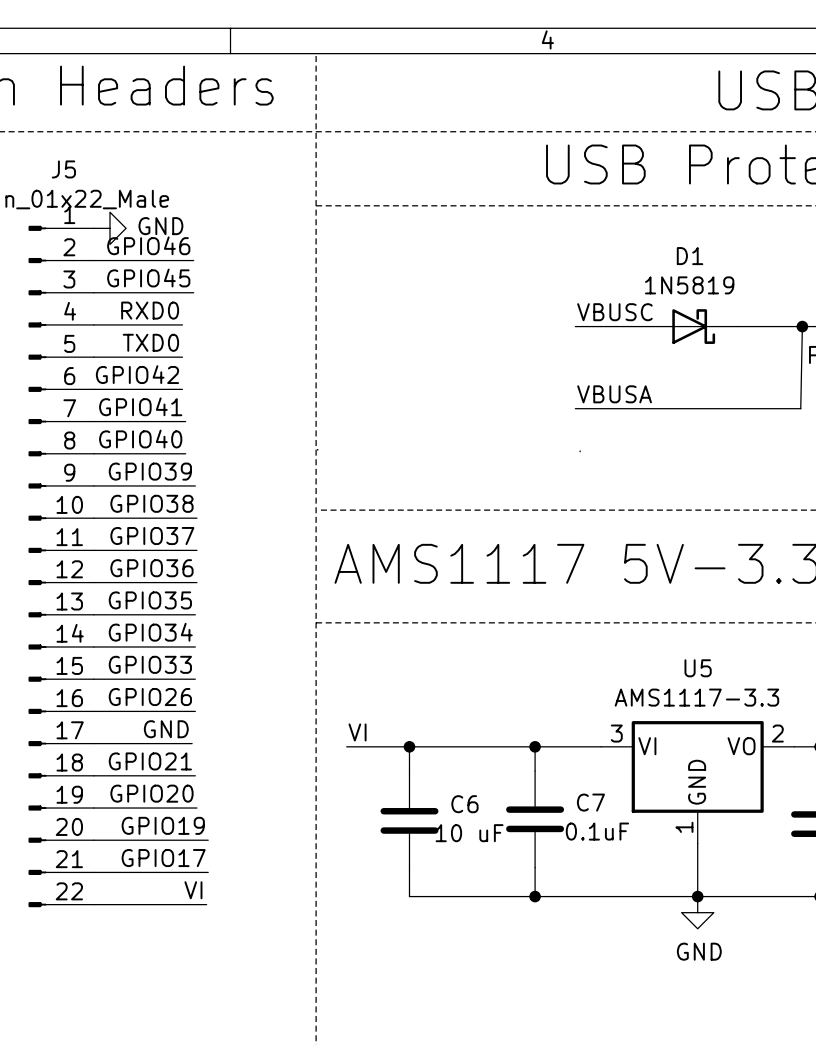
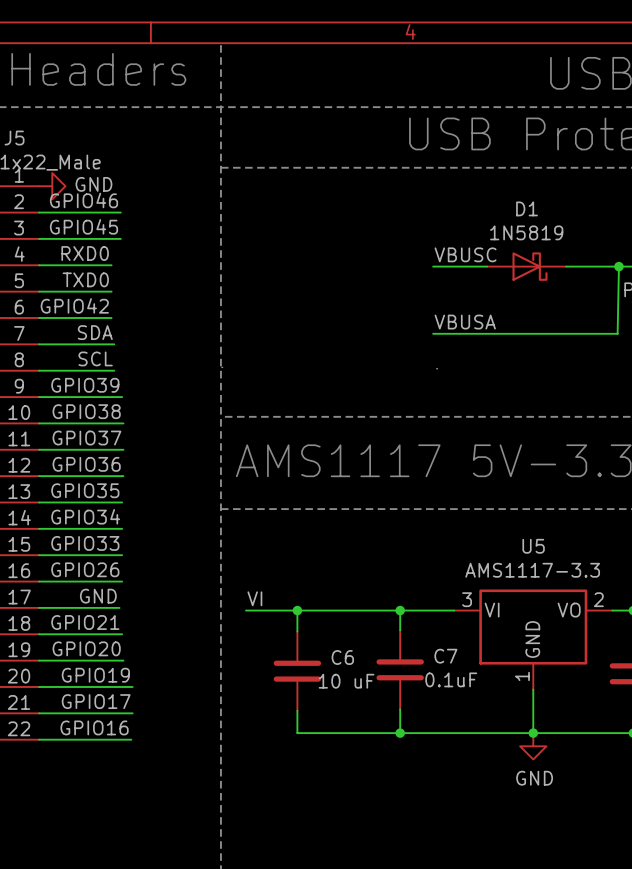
label: GPIO41 (140, 406) -> SDA (95, 332)
label: GPIO40 (140, 439) -> SCL (95, 358)
label: VI (193, 890) -> GPIO16 (94, 727)

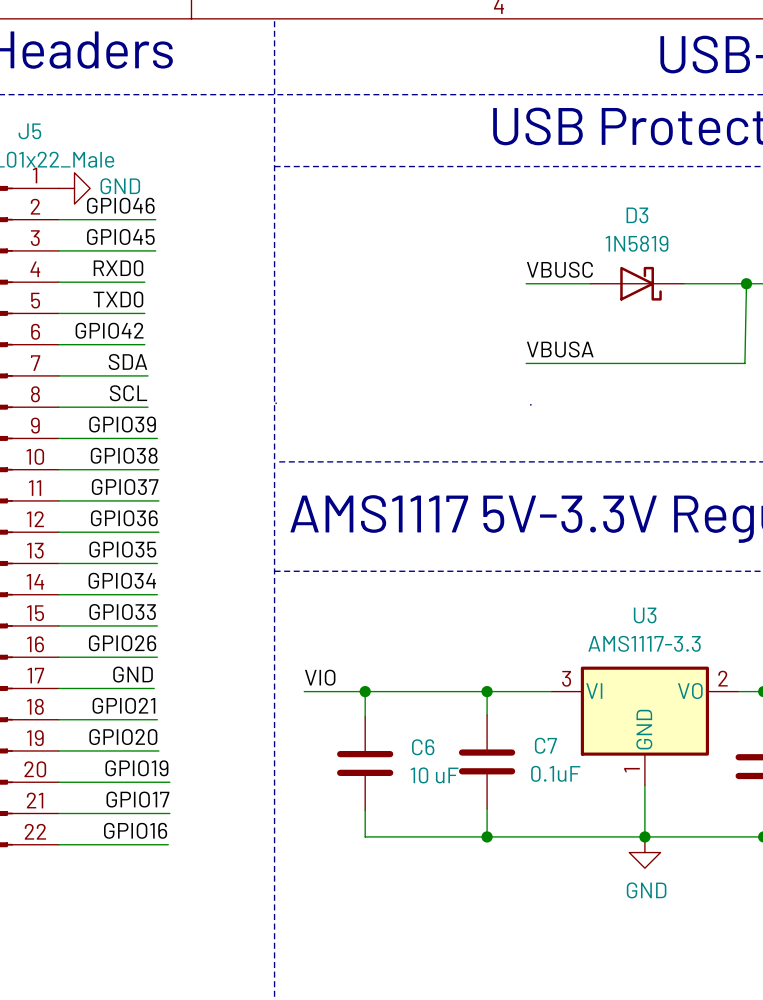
D1 name: D1 (527, 208) -> D3 (637, 215)
U5 name: U5 (533, 546) -> U3 (645, 615)
label: VI (254, 598) -> VIO (320, 677)

